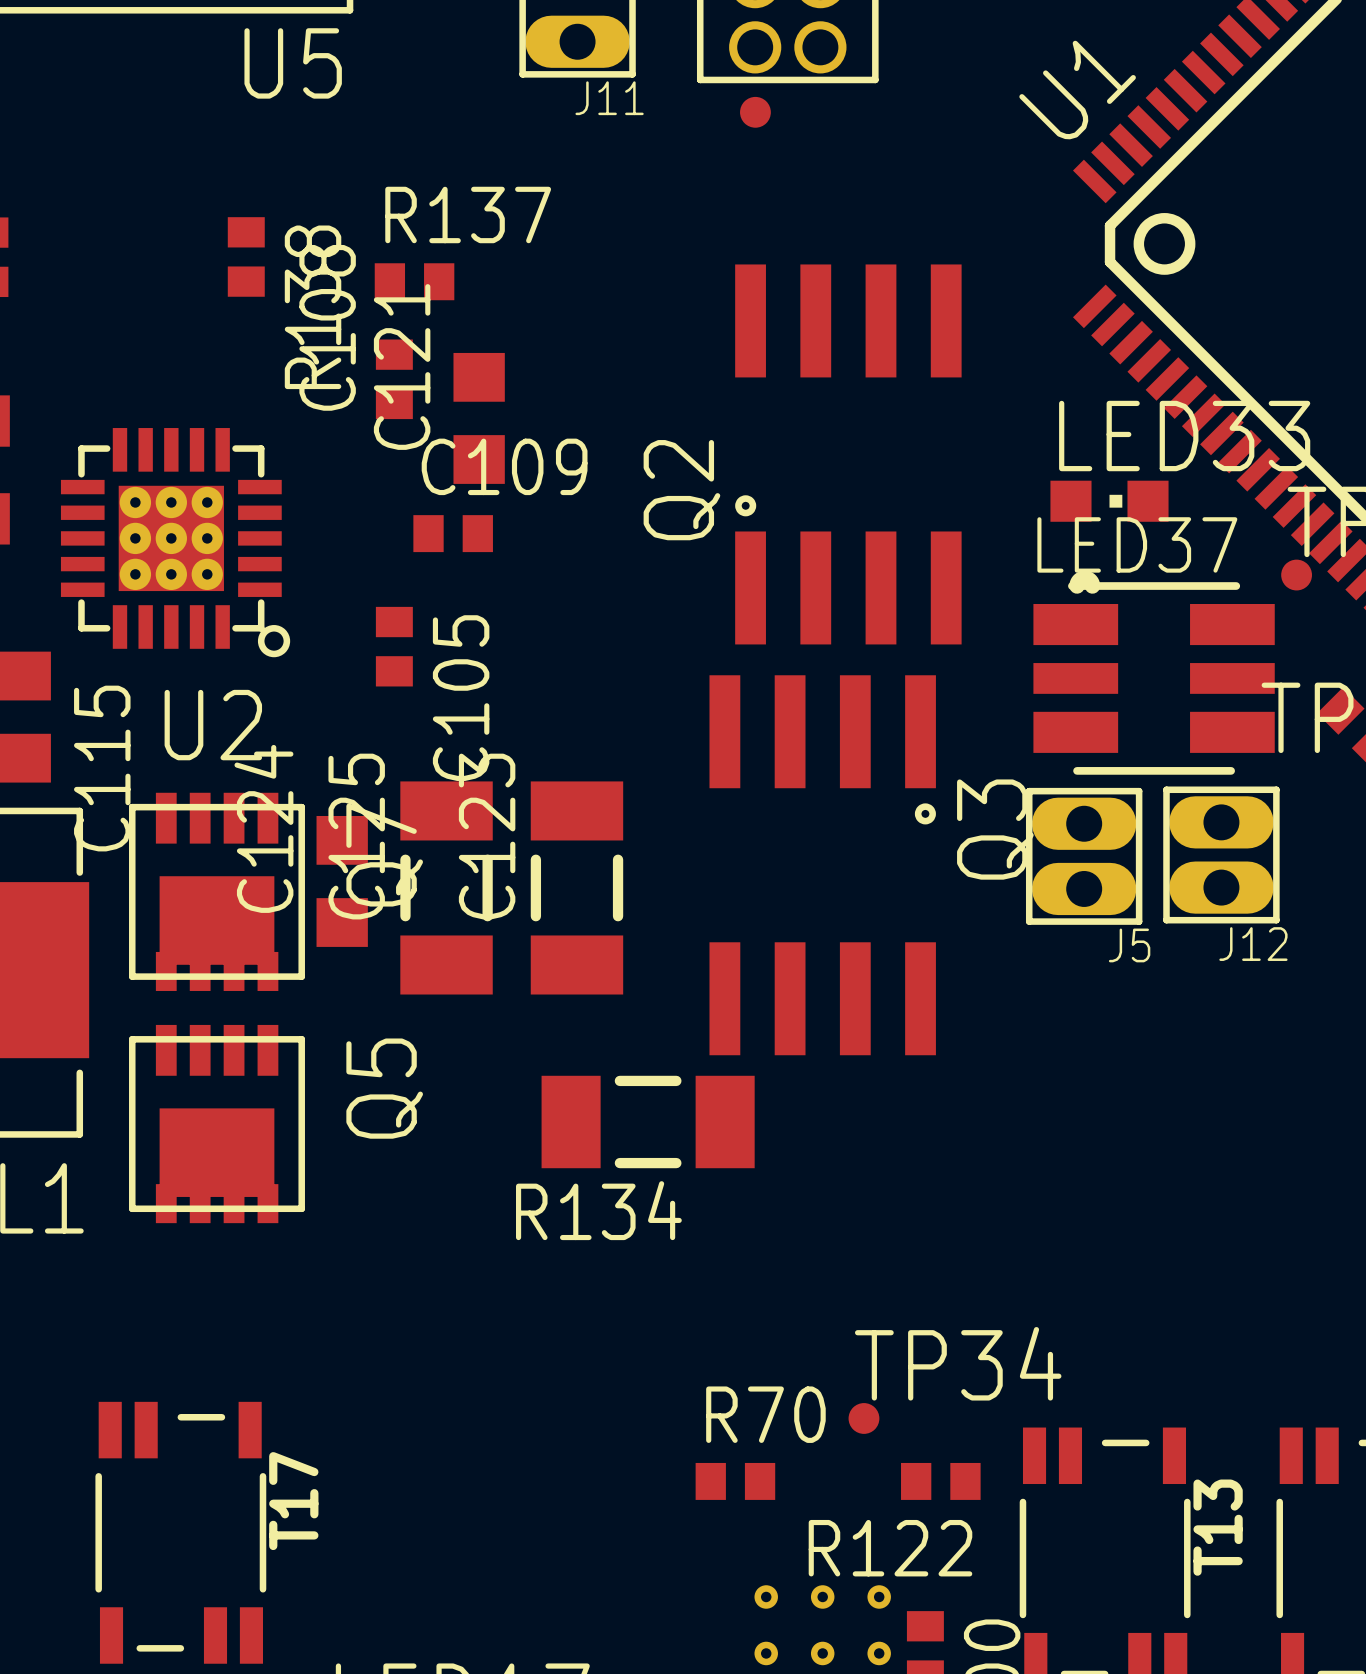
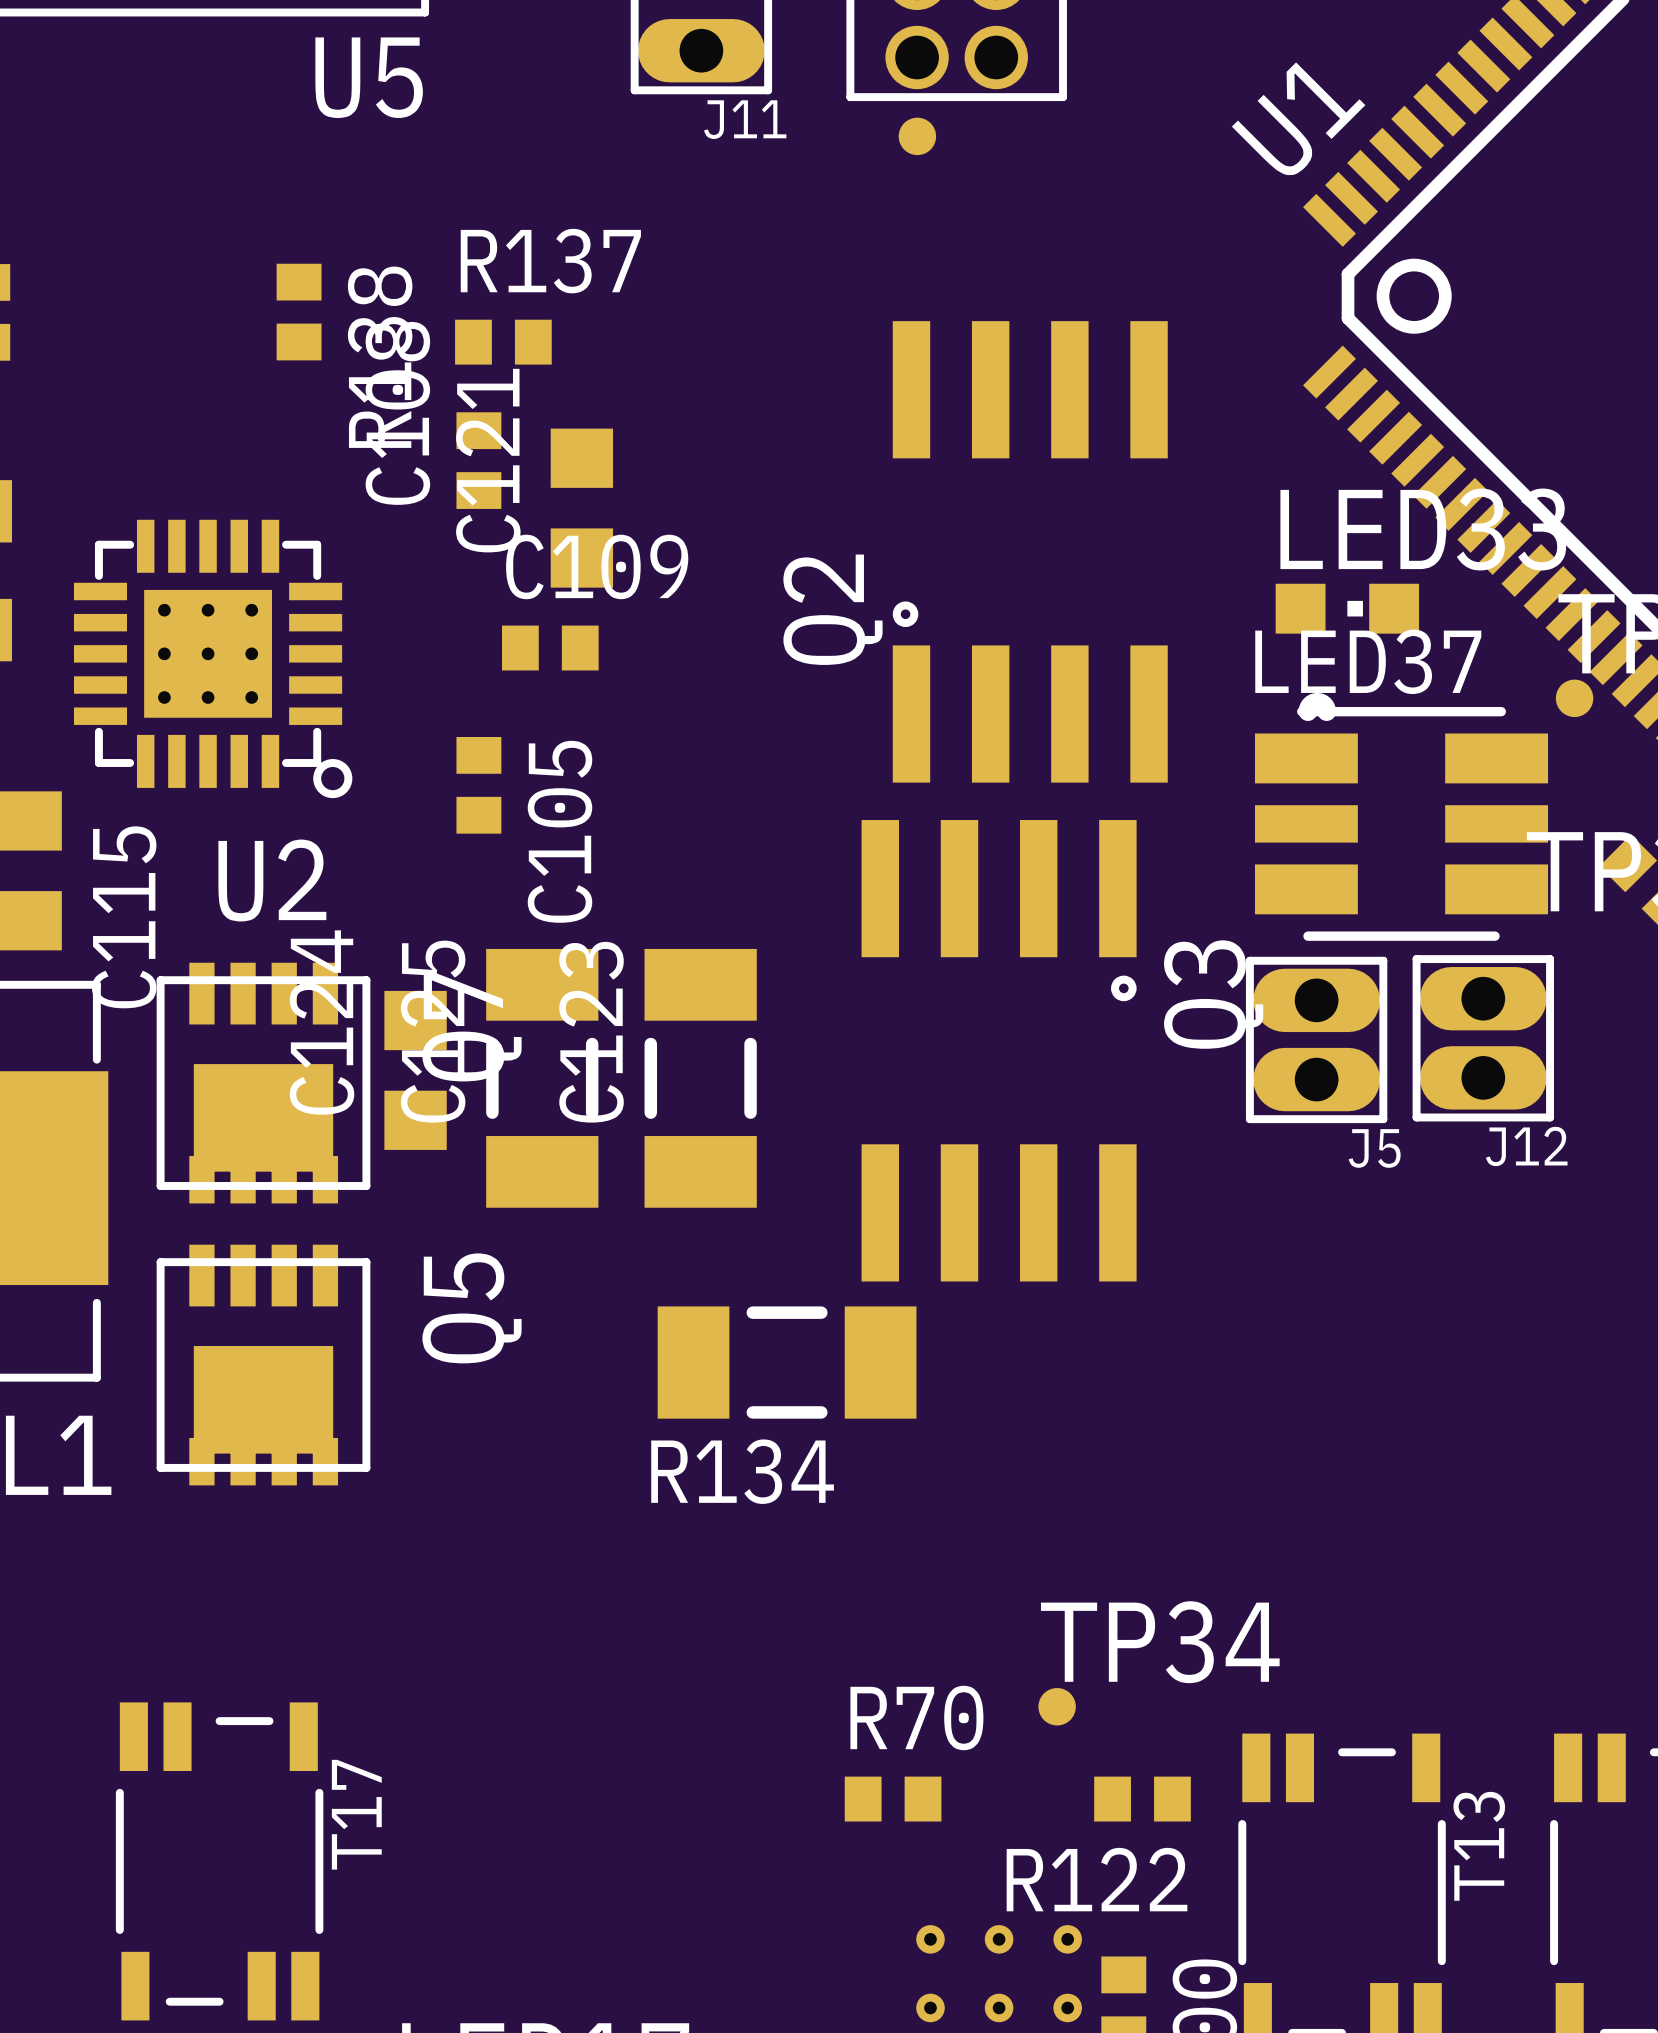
TP34 position: (863, 1418) -> (1057, 1706)

